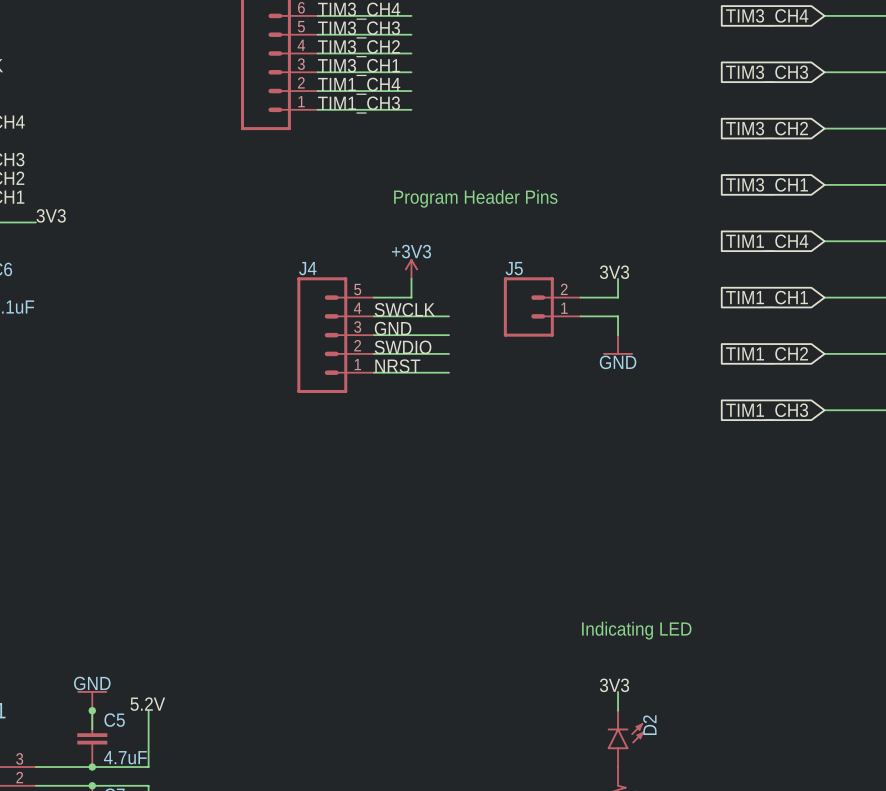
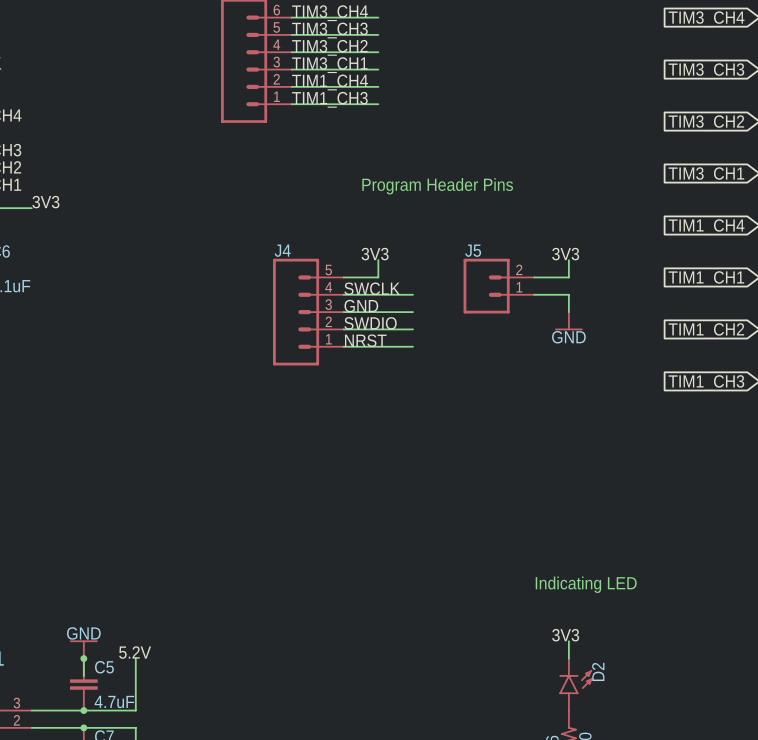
power symbol: +3V3 (411, 268) -> none
label: none -> 3V3 (375, 254)

